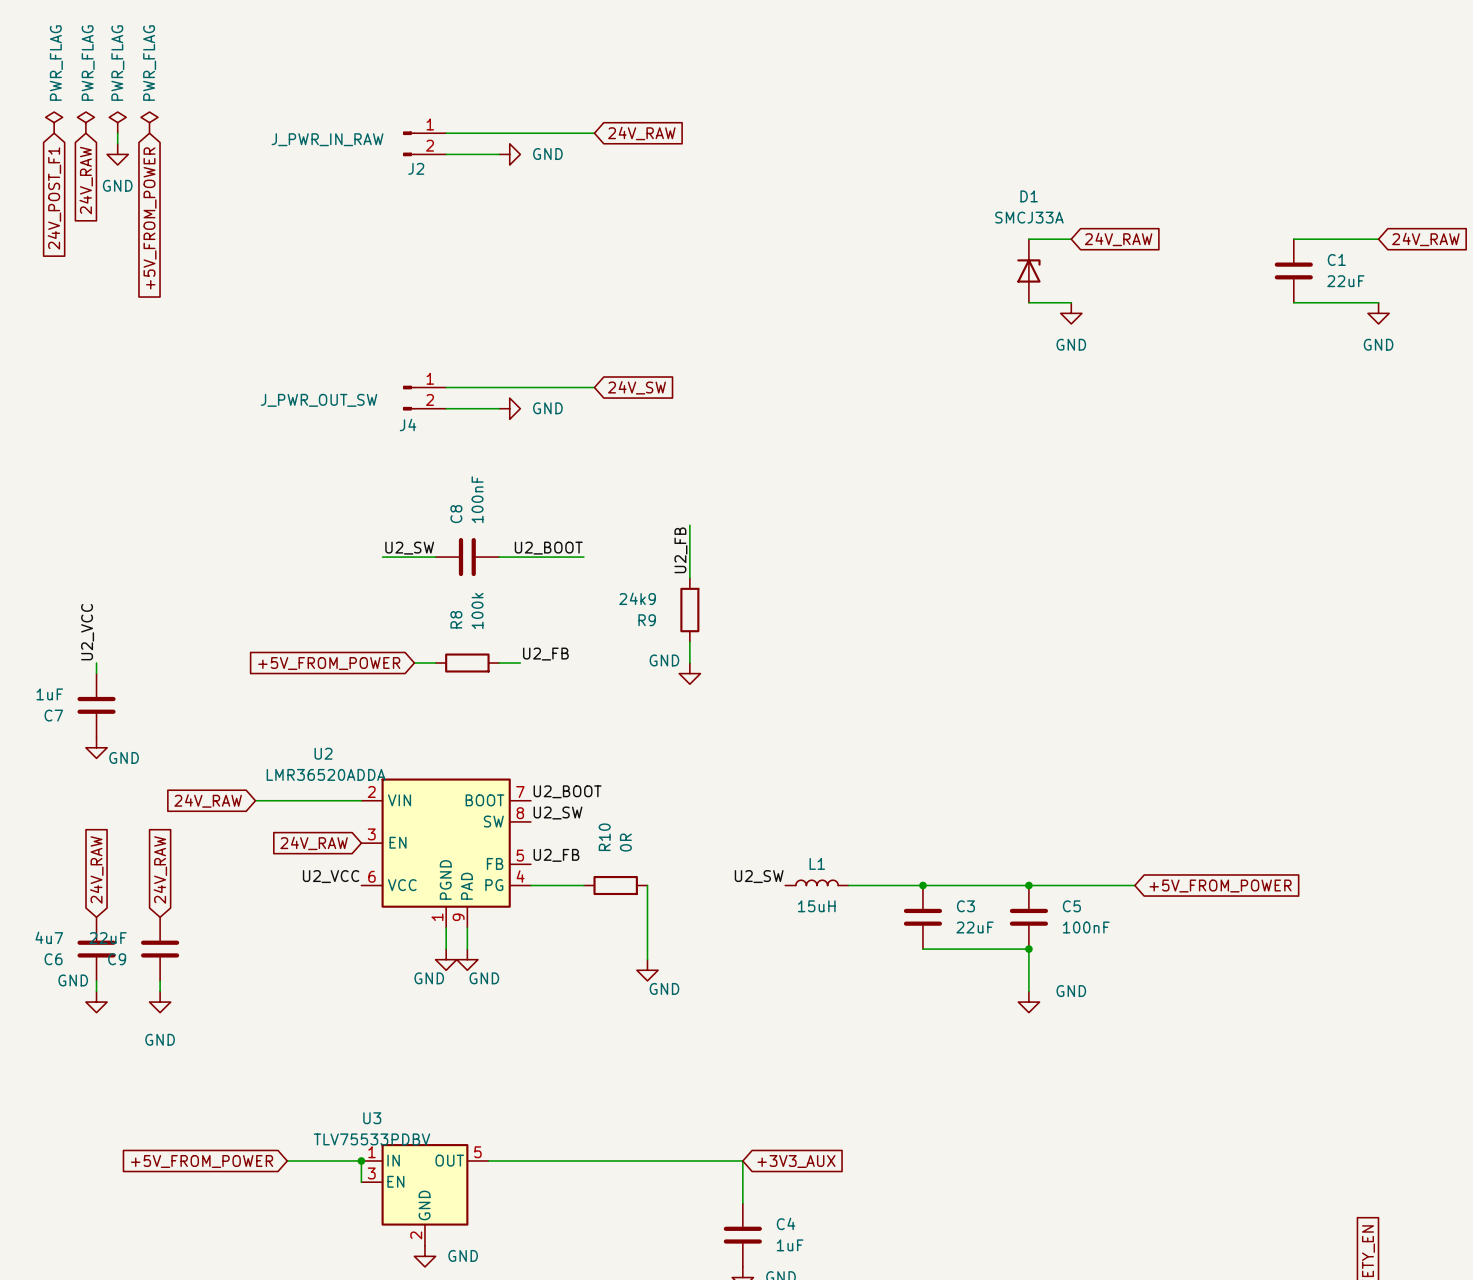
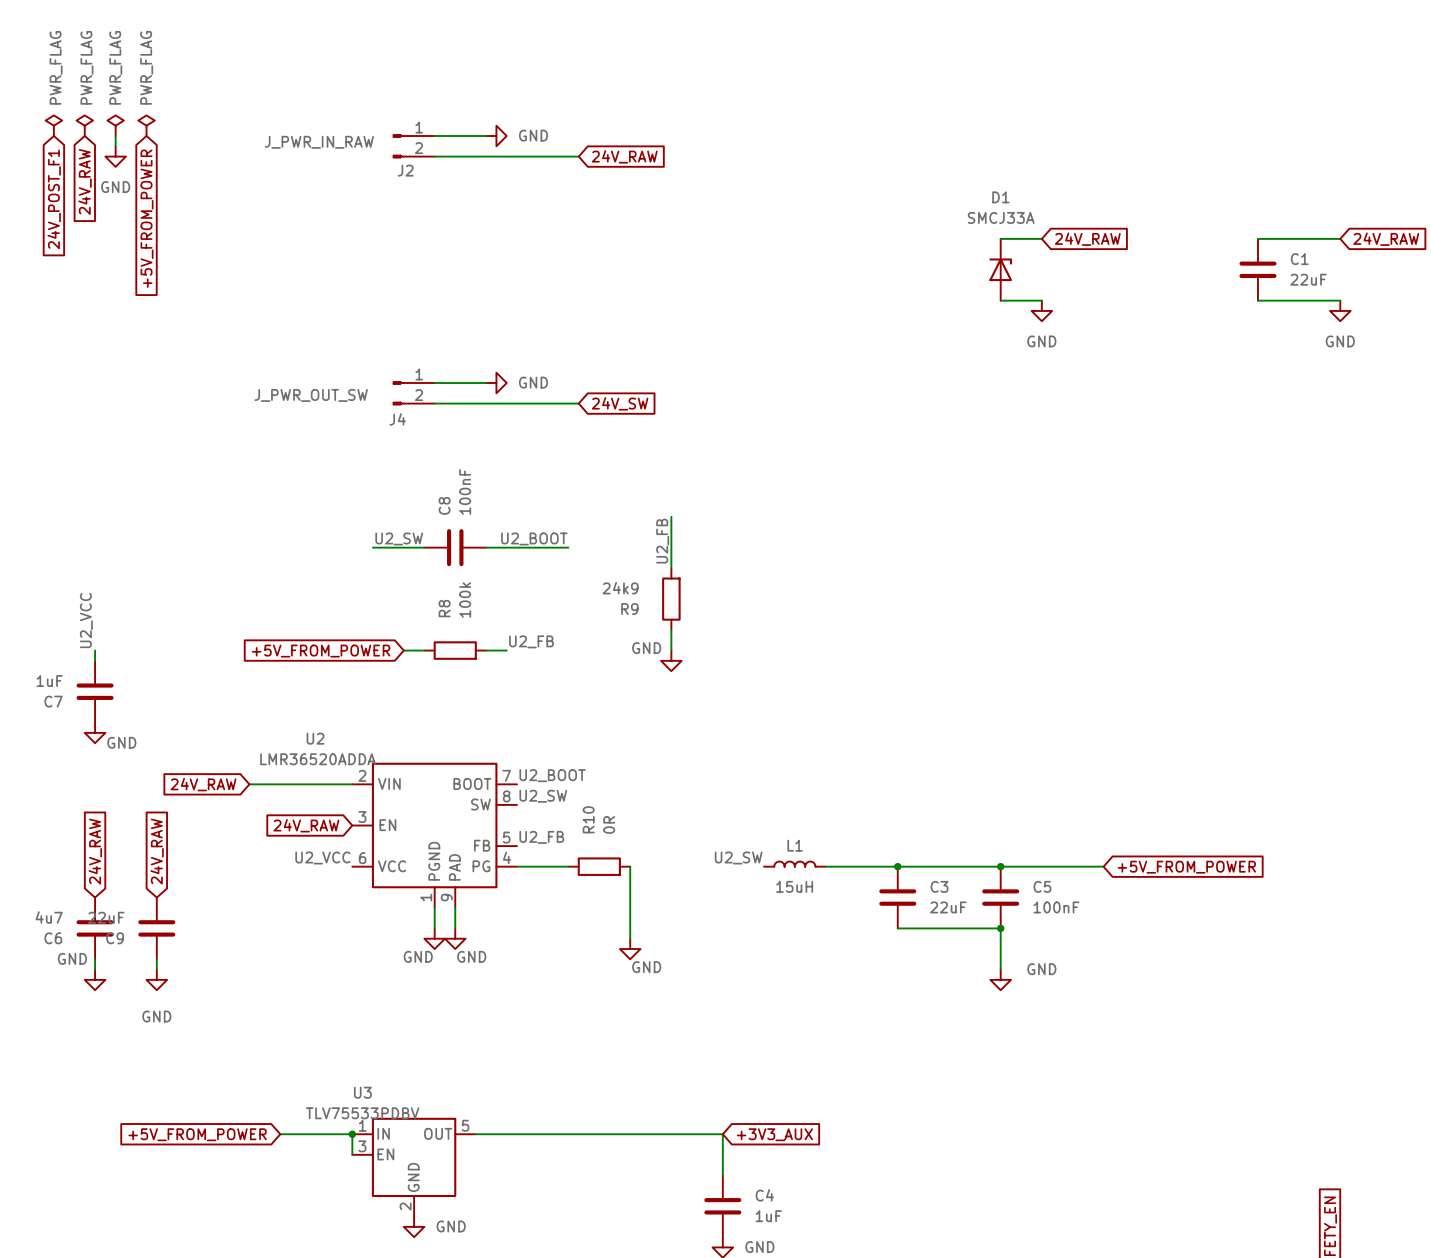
wire: (499, 133) (594, 133) -> (486, 156) (578, 156)
global label position: 24V_RAW (641, 133) -> 24V_RAW (624, 156)
power symbol position: GND (509, 154) -> GND (496, 136)
wire: (499, 387) (594, 387) -> (486, 403) (578, 403)
global label position: 24V_SW (637, 387) -> 24V_SW (620, 403)
power symbol position: GND (509, 408) -> GND (496, 382)

